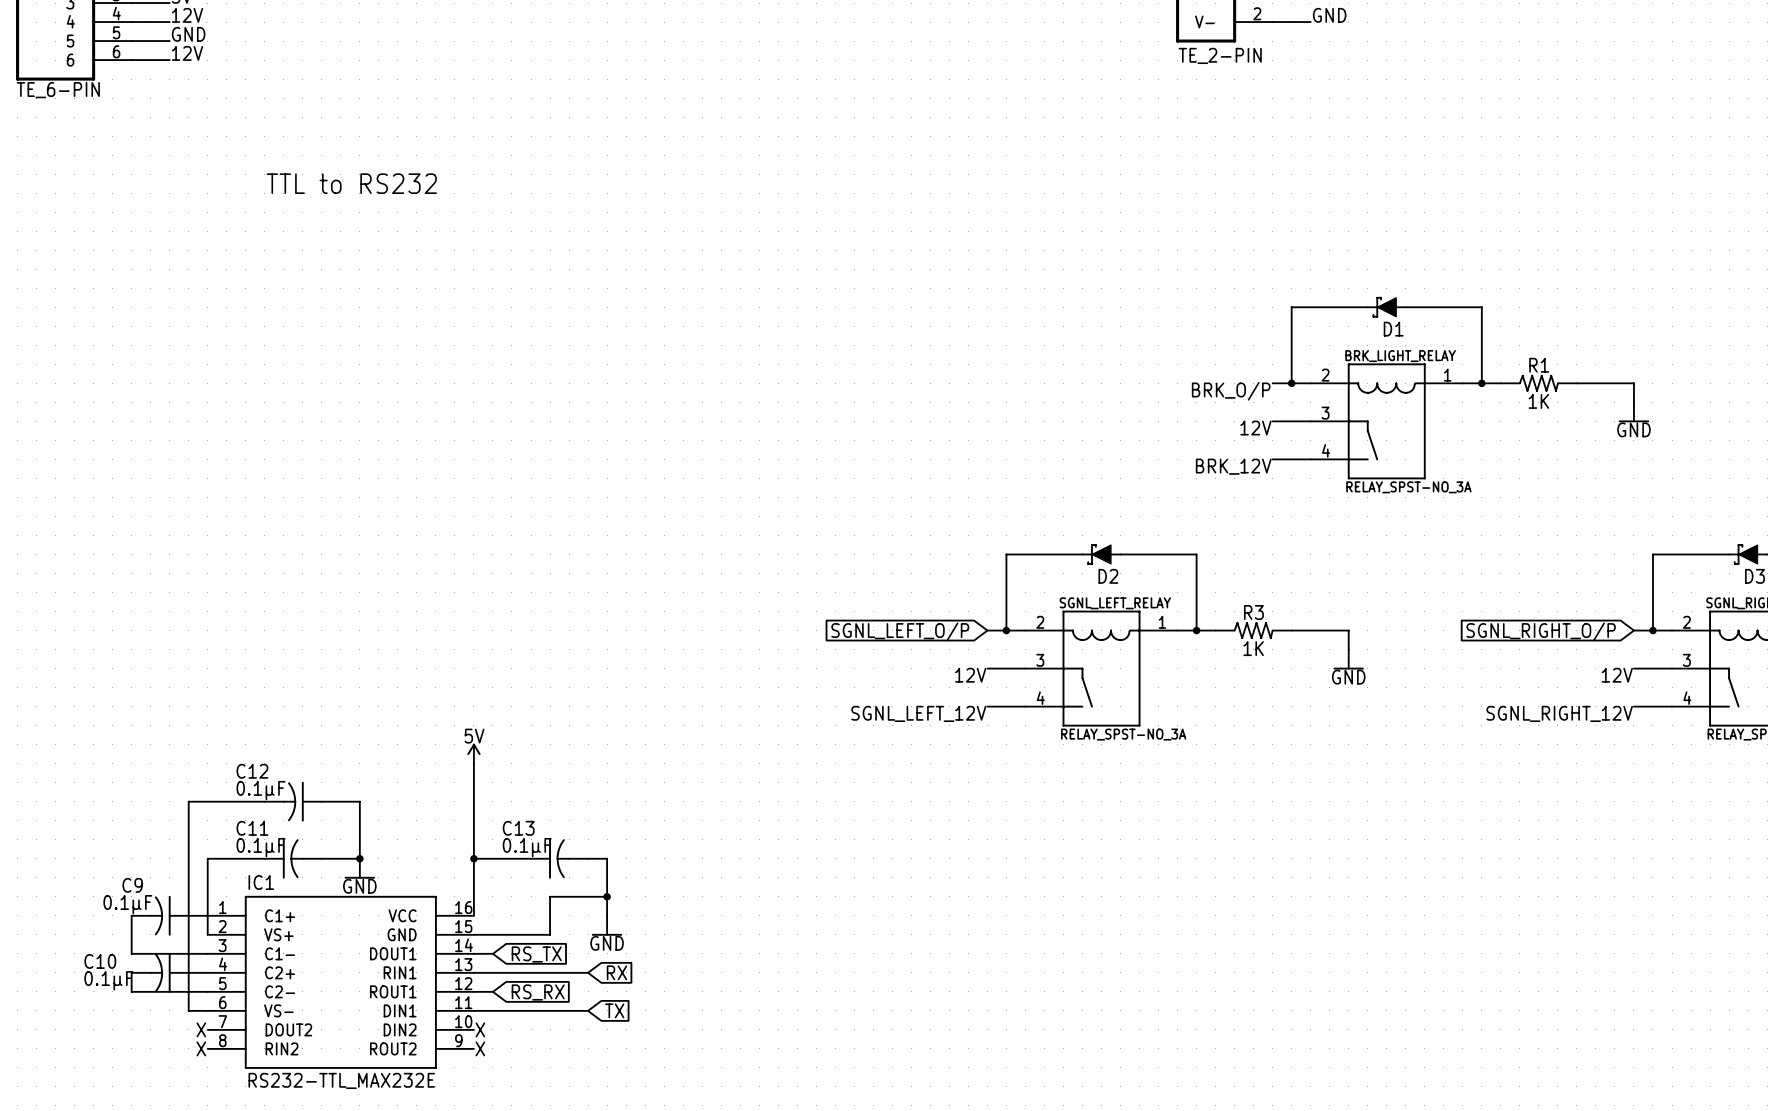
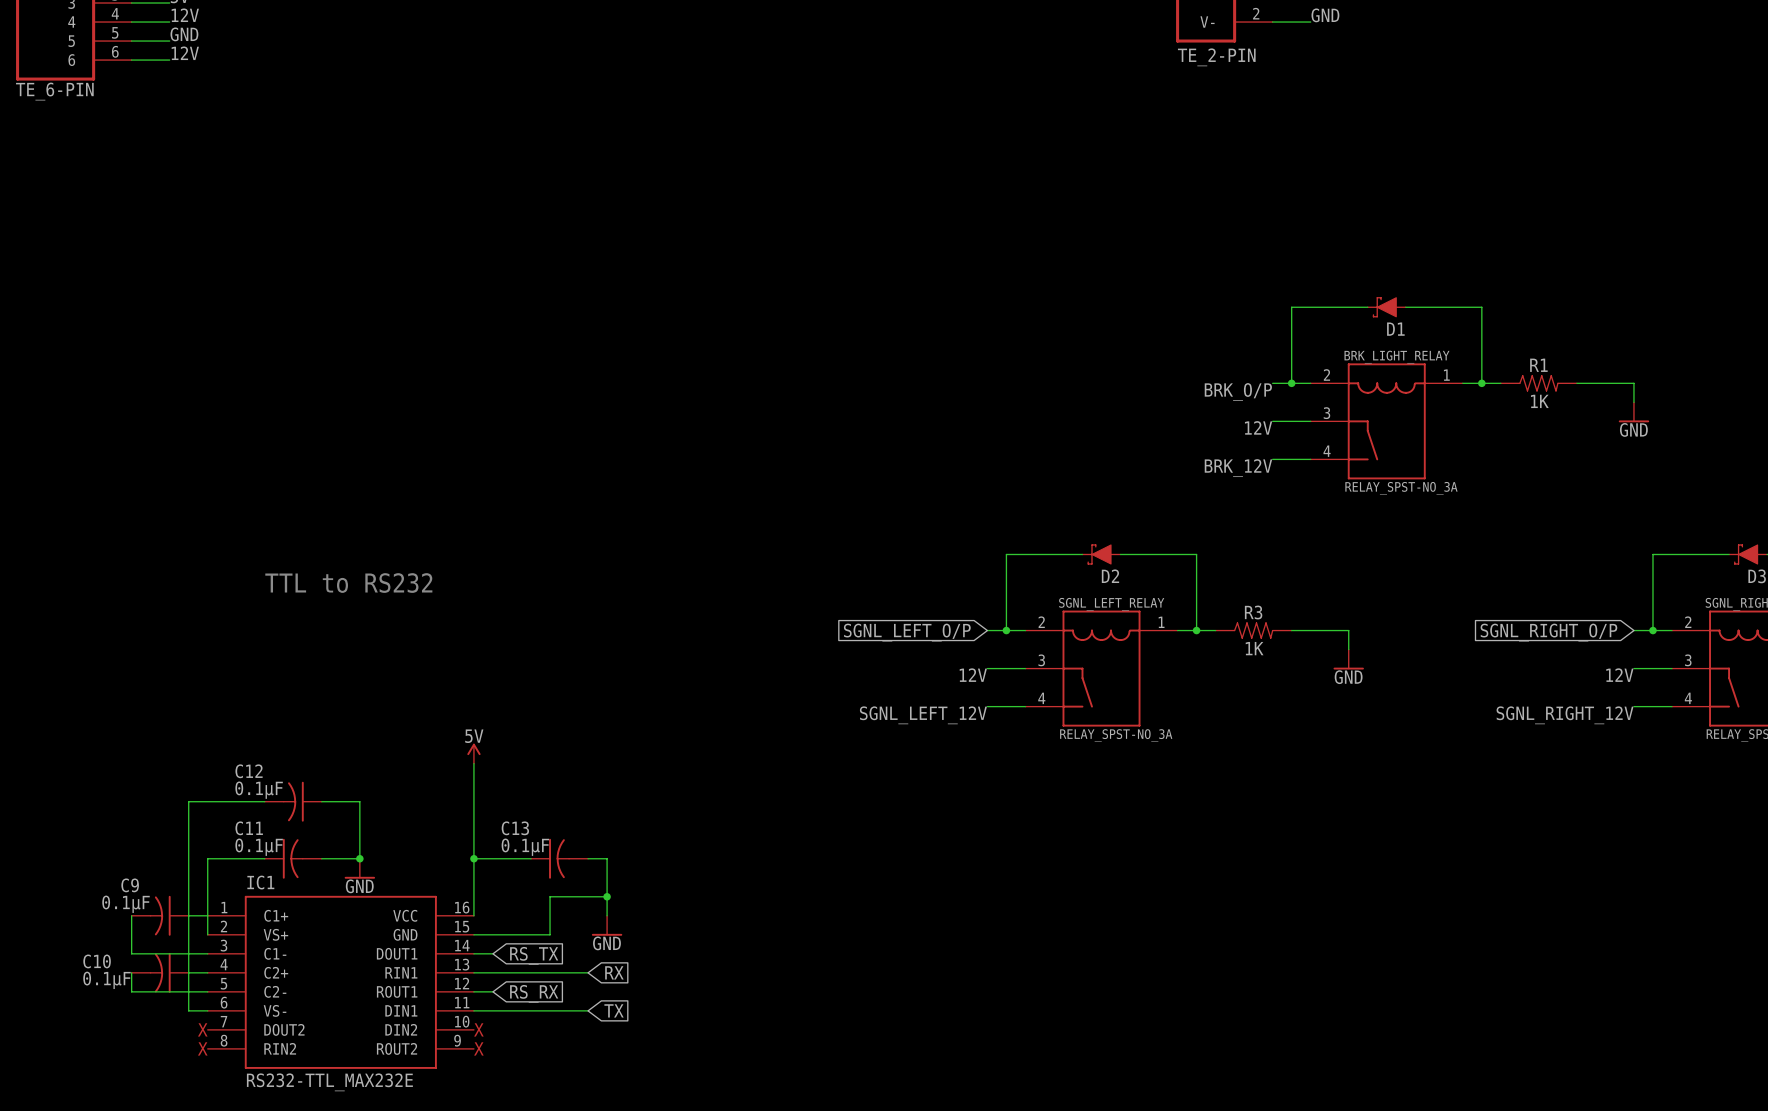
text: TTL to RS232 (351, 183) -> none
text: none -> TTL to RS232 (348, 583)

